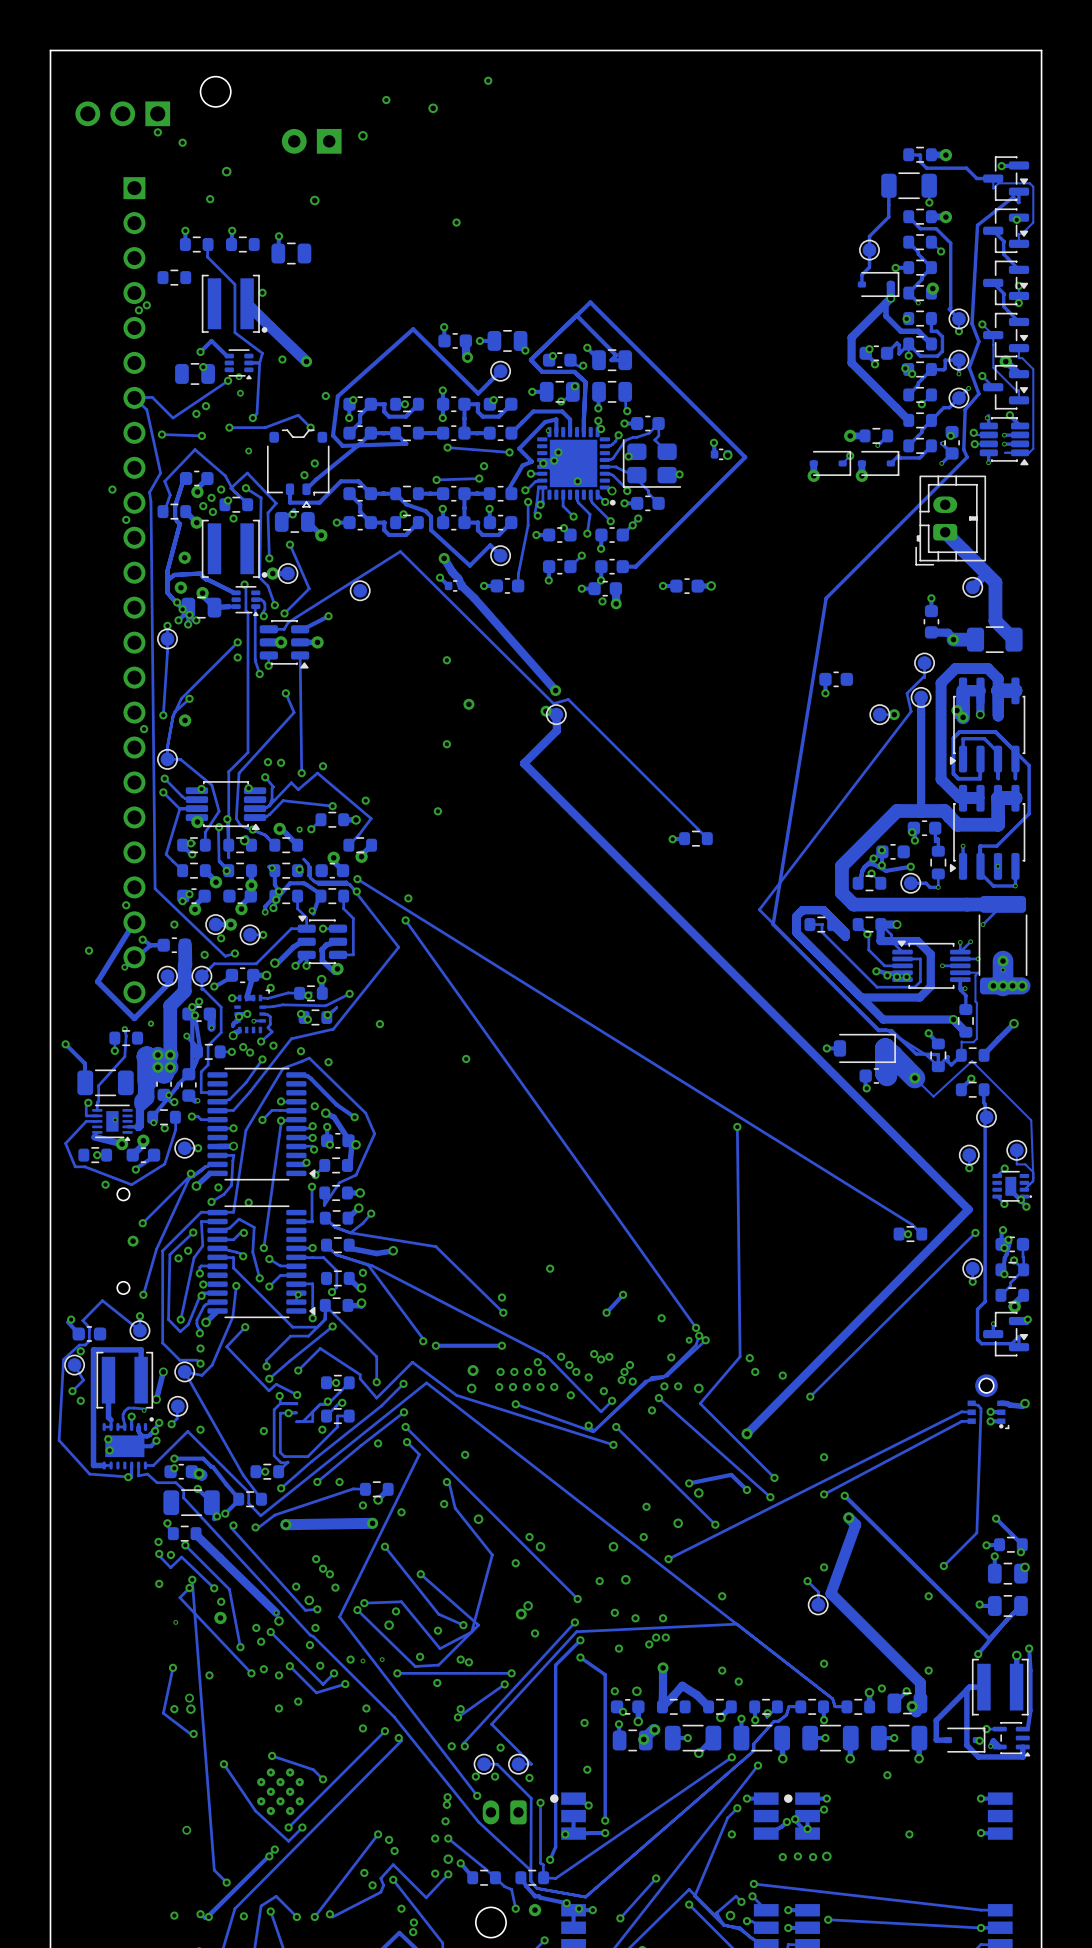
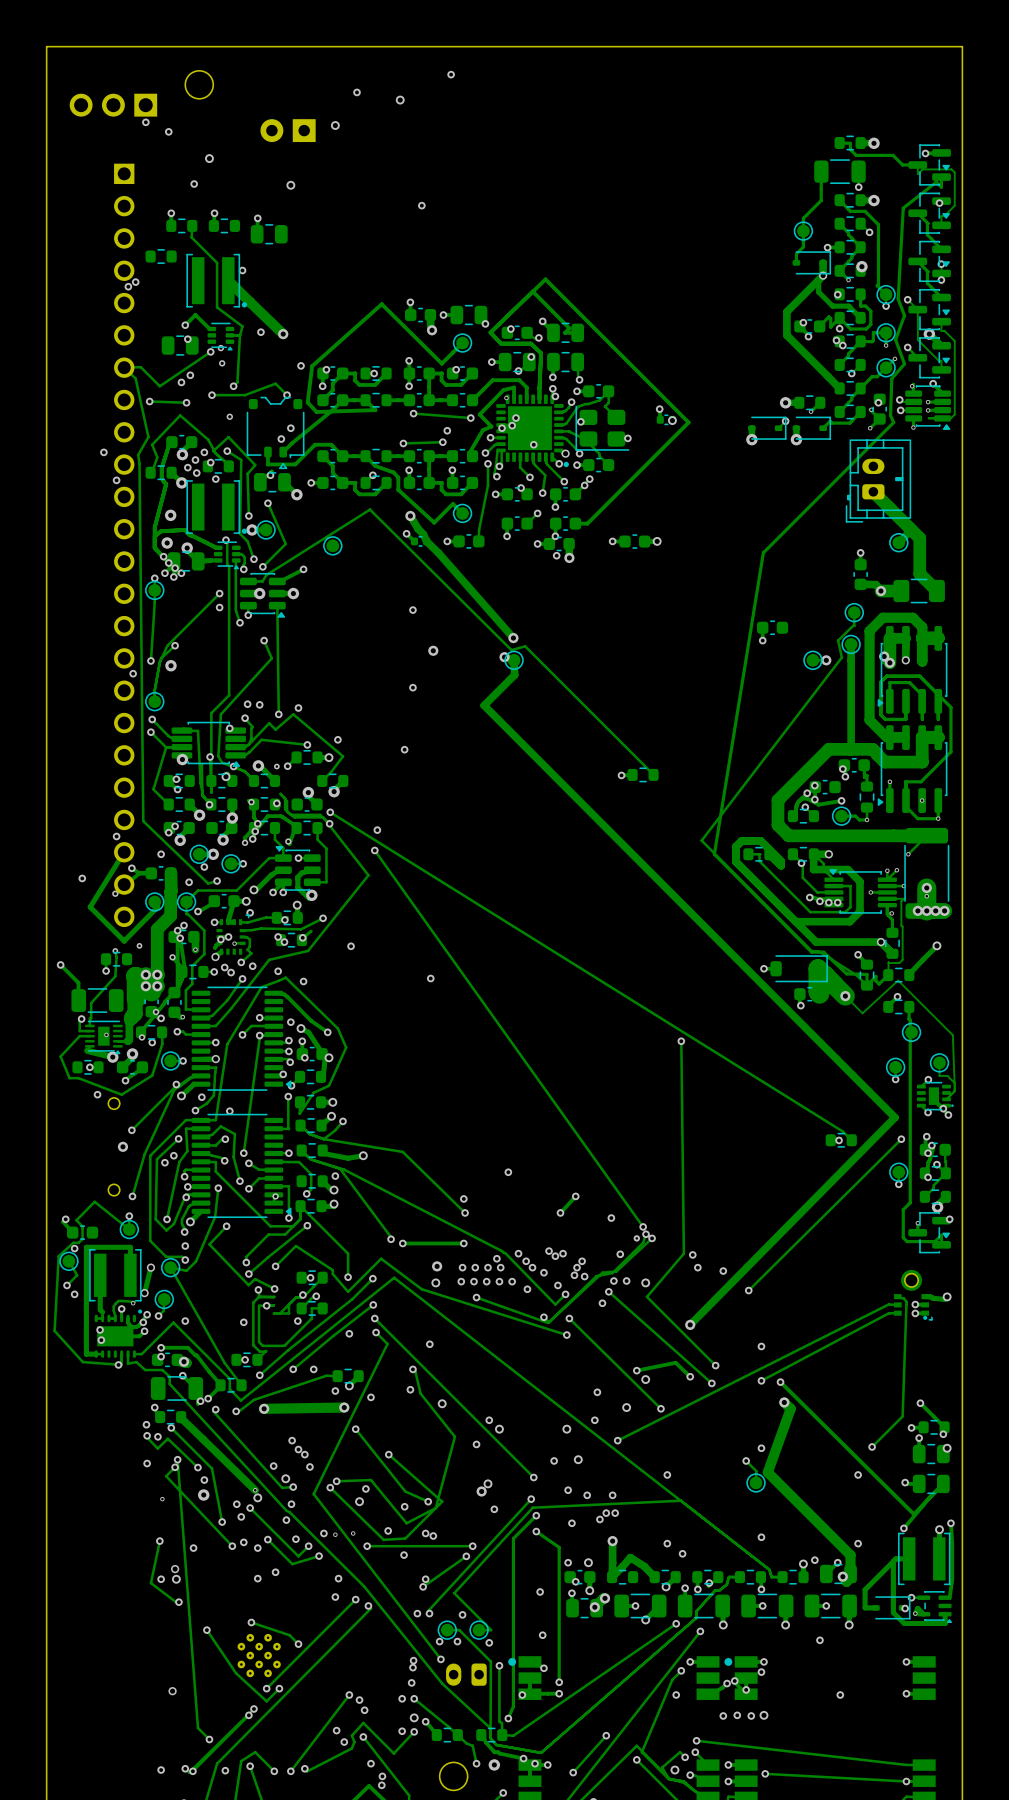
track: (167, 759) (180, 759) (211, 785) (219, 811) (205, 832) (205, 845) -> none
via: (201, 788) -> none
track: none -> (181, 730) (198, 730) (200, 783) (203, 795)
via: (219, 827) -> none

